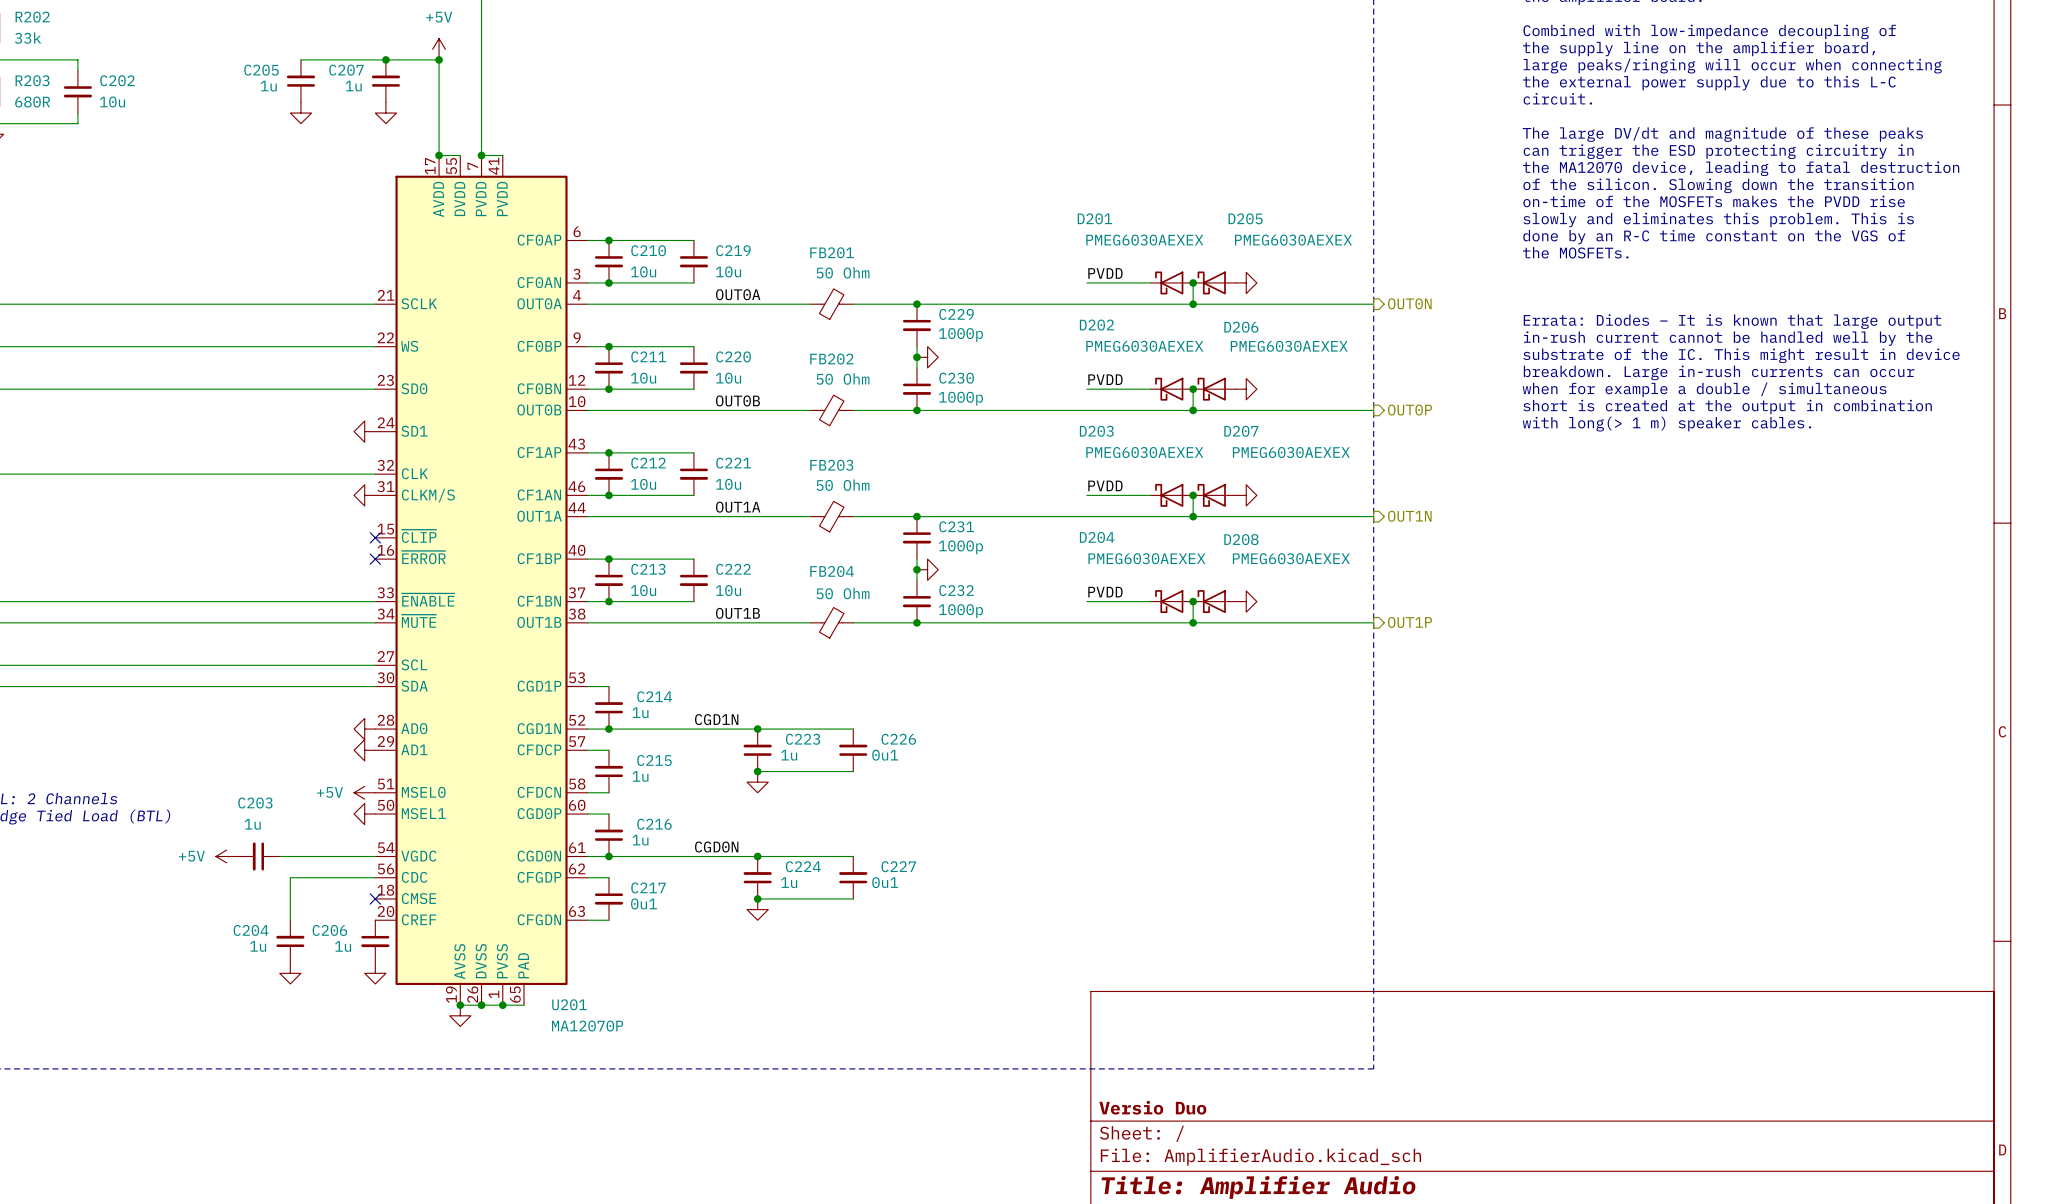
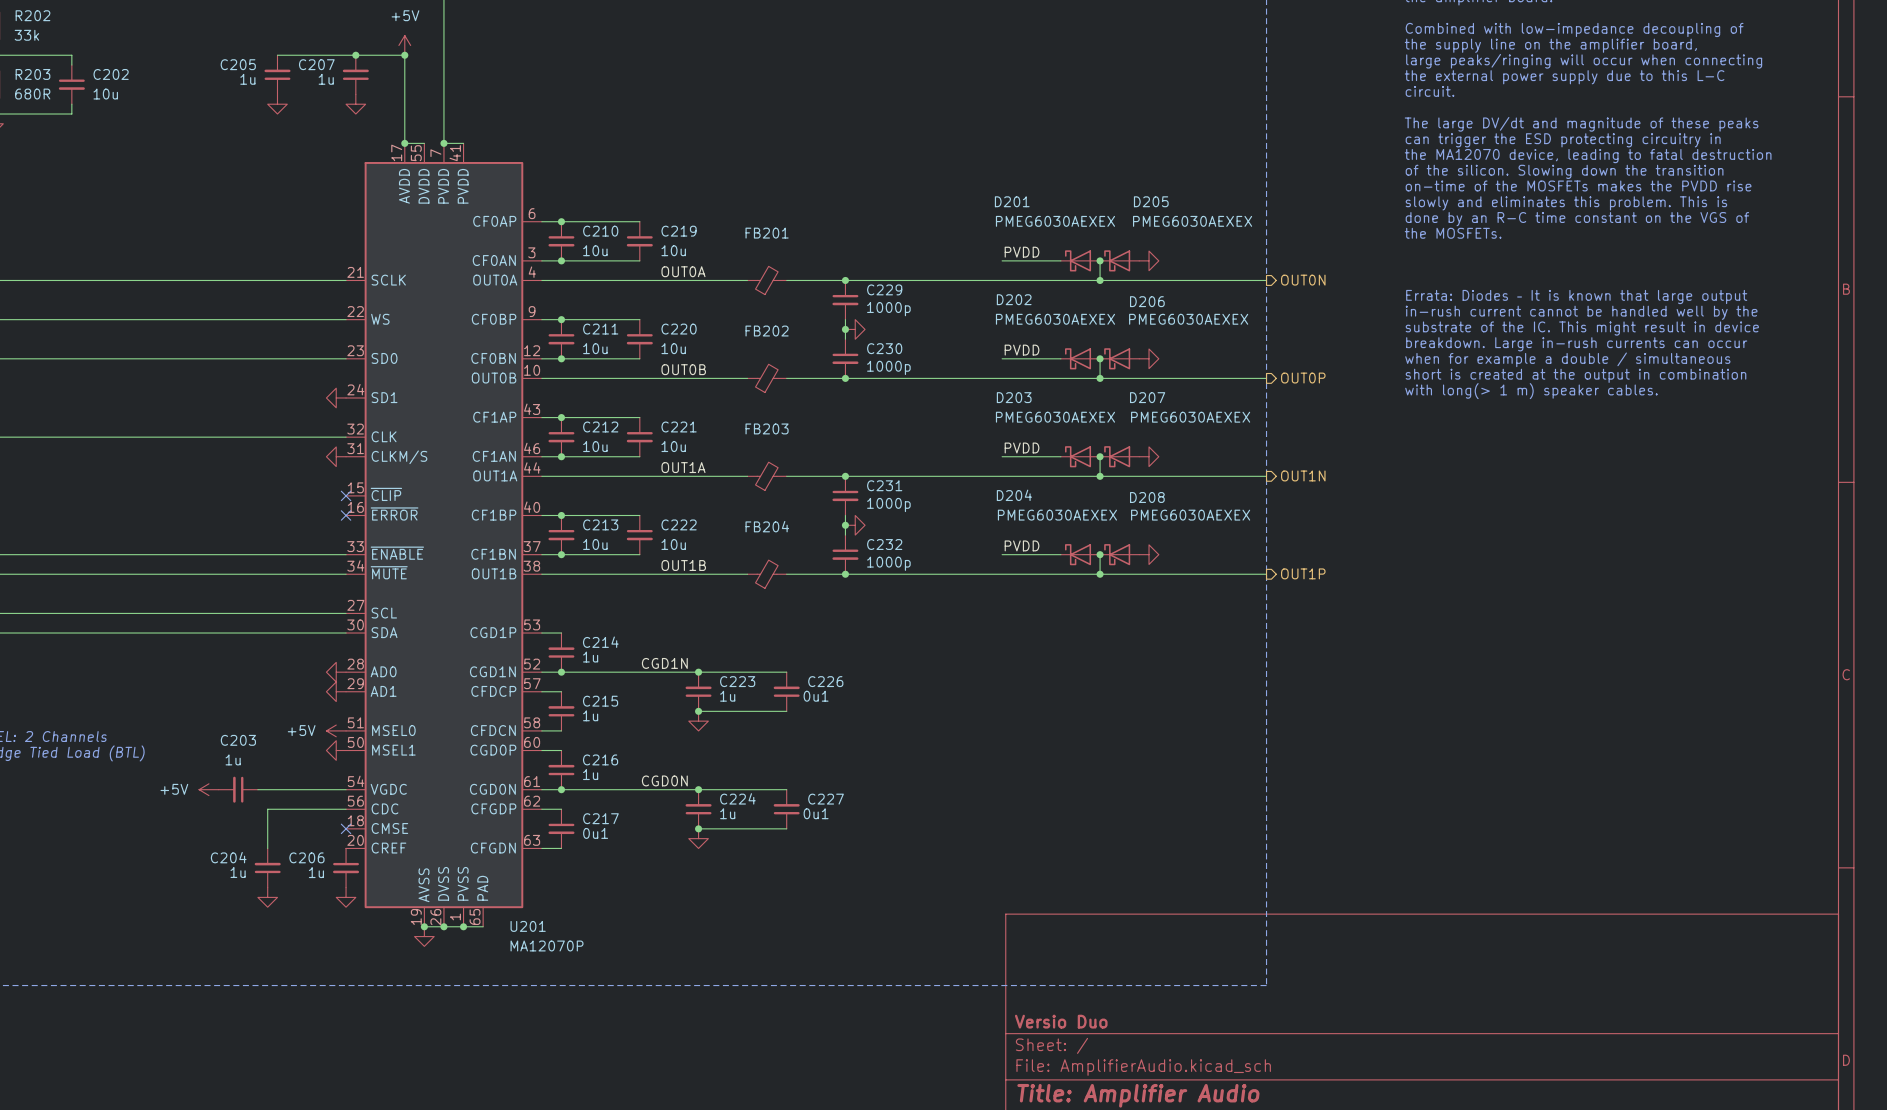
FB201 value: 50 Ohm (843, 272) -> none
FB202 value: 50 Ohm (843, 378) -> none
FB203 value: 50 Ohm (843, 485) -> none
FB204 value: 50 Ohm (843, 593) -> none

